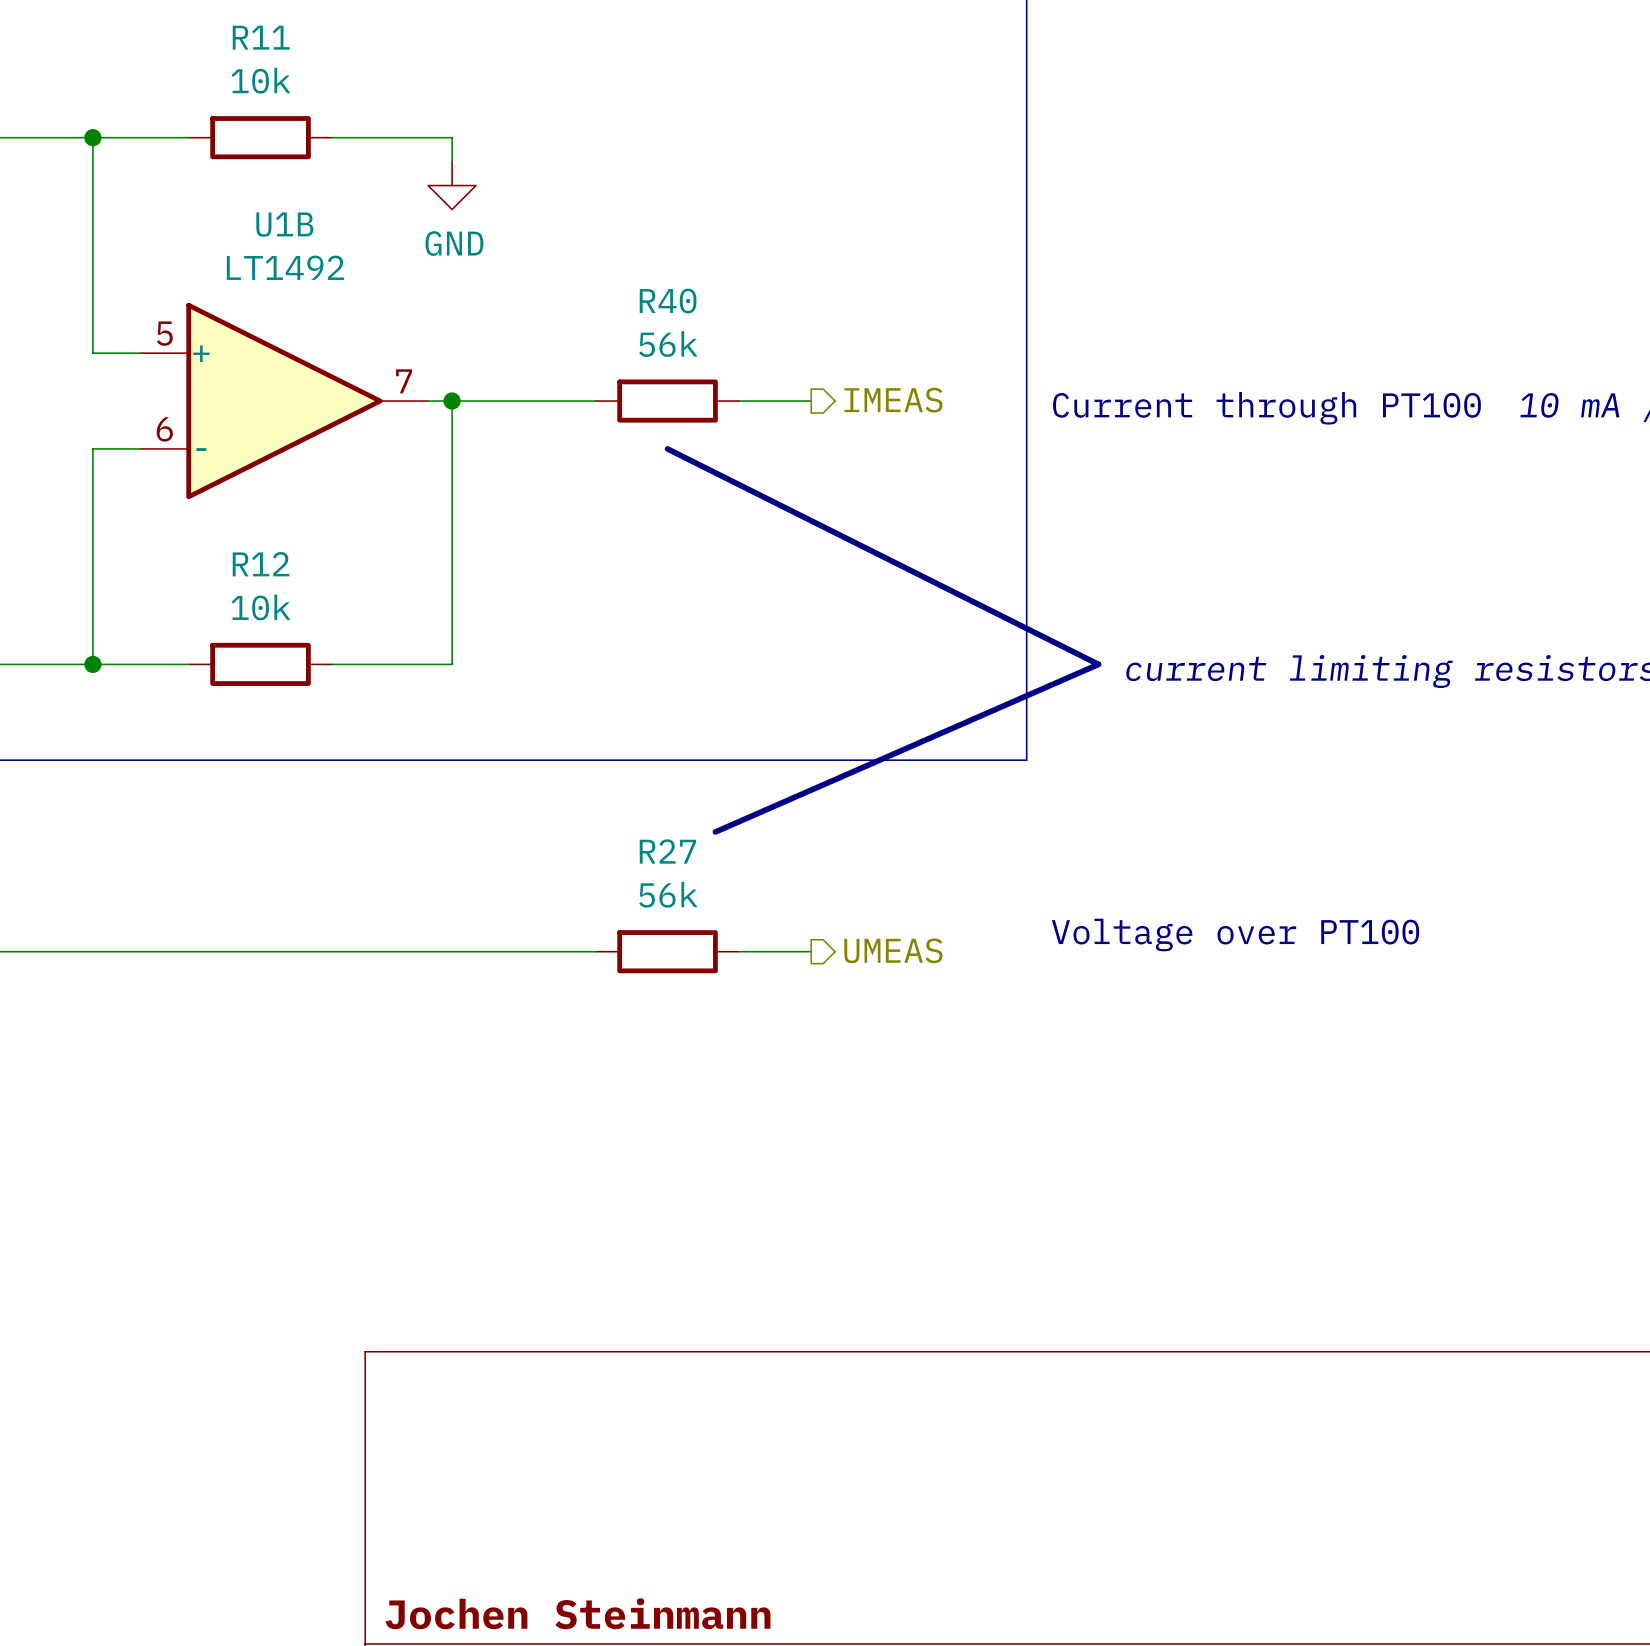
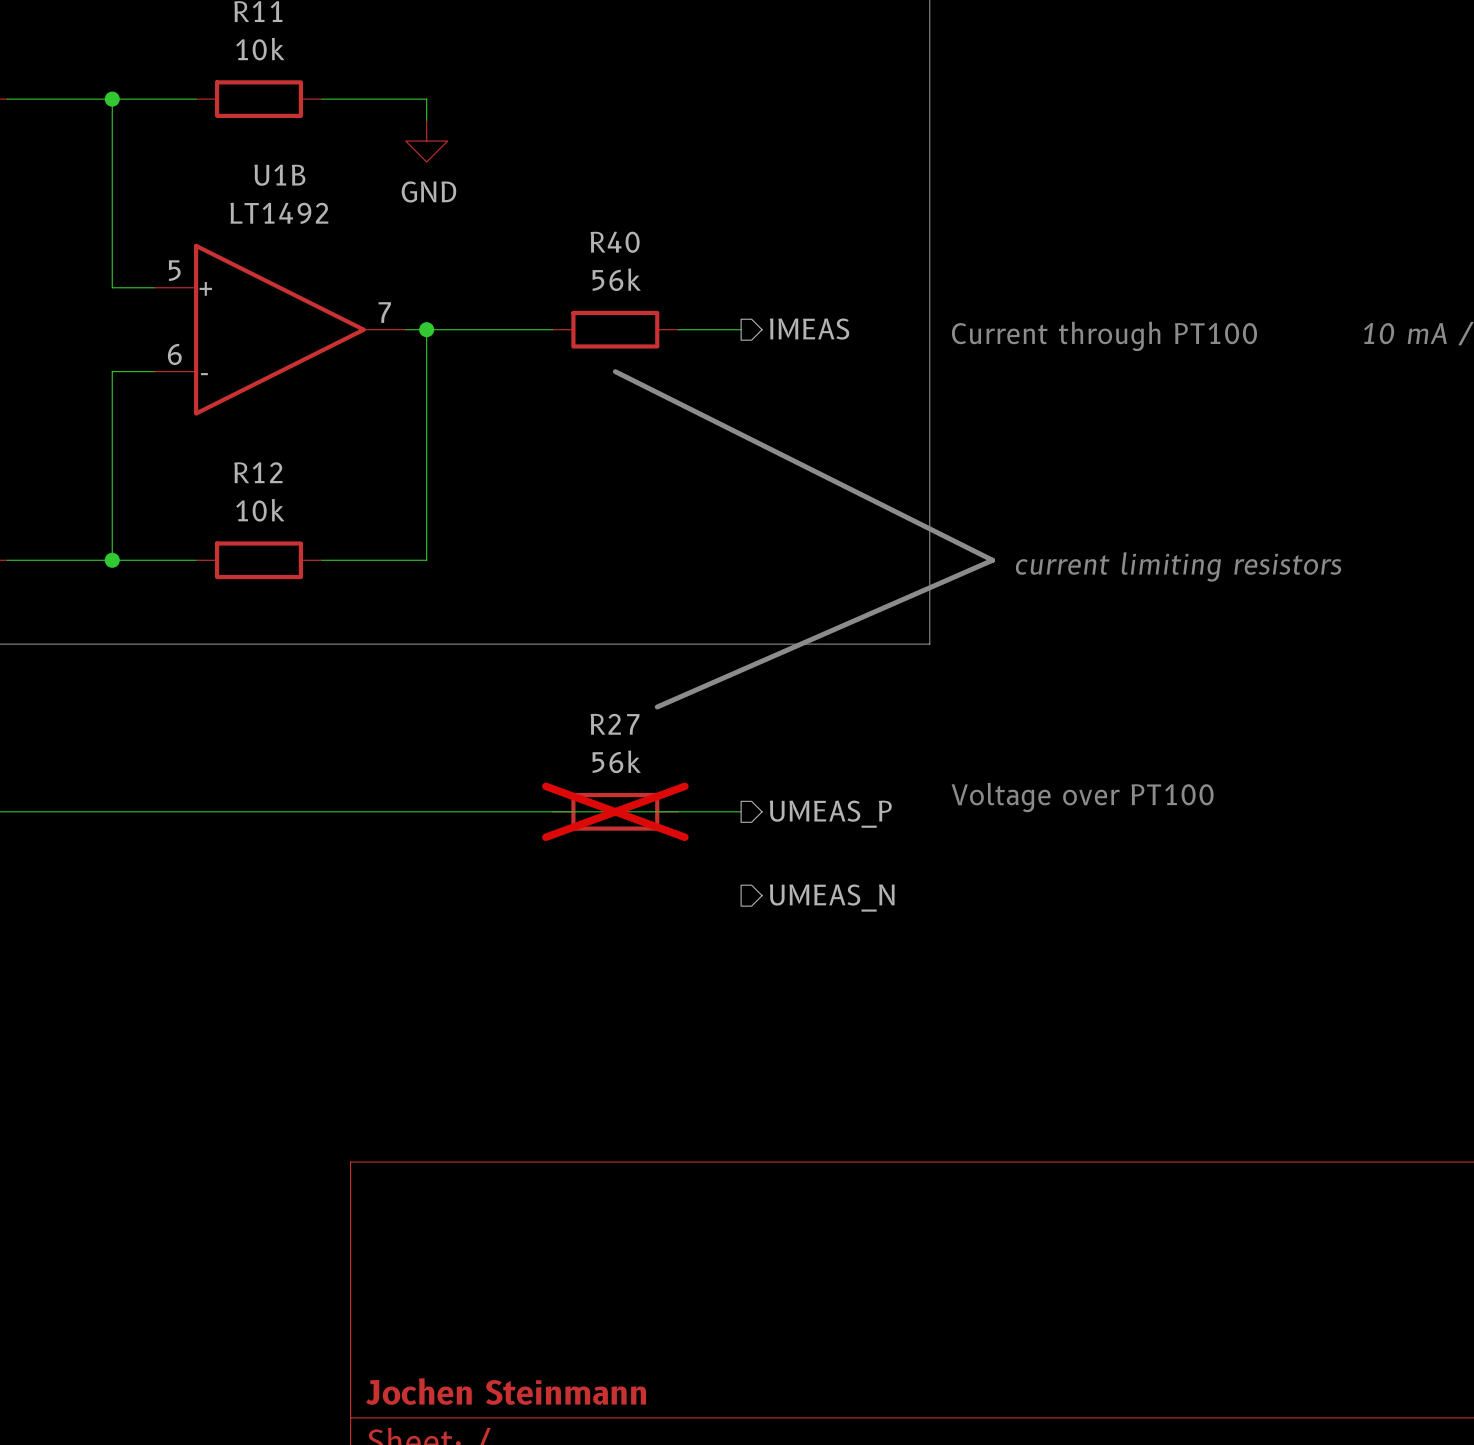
hierarchical label: UMEAS (893, 950) -> UMEAS_P (830, 814)
wire: none -> (552, 811) (678, 811)
R27 do-not-place cross: none -> (615, 811)
hierarchical label: none -> UMEAS_N (832, 898)

